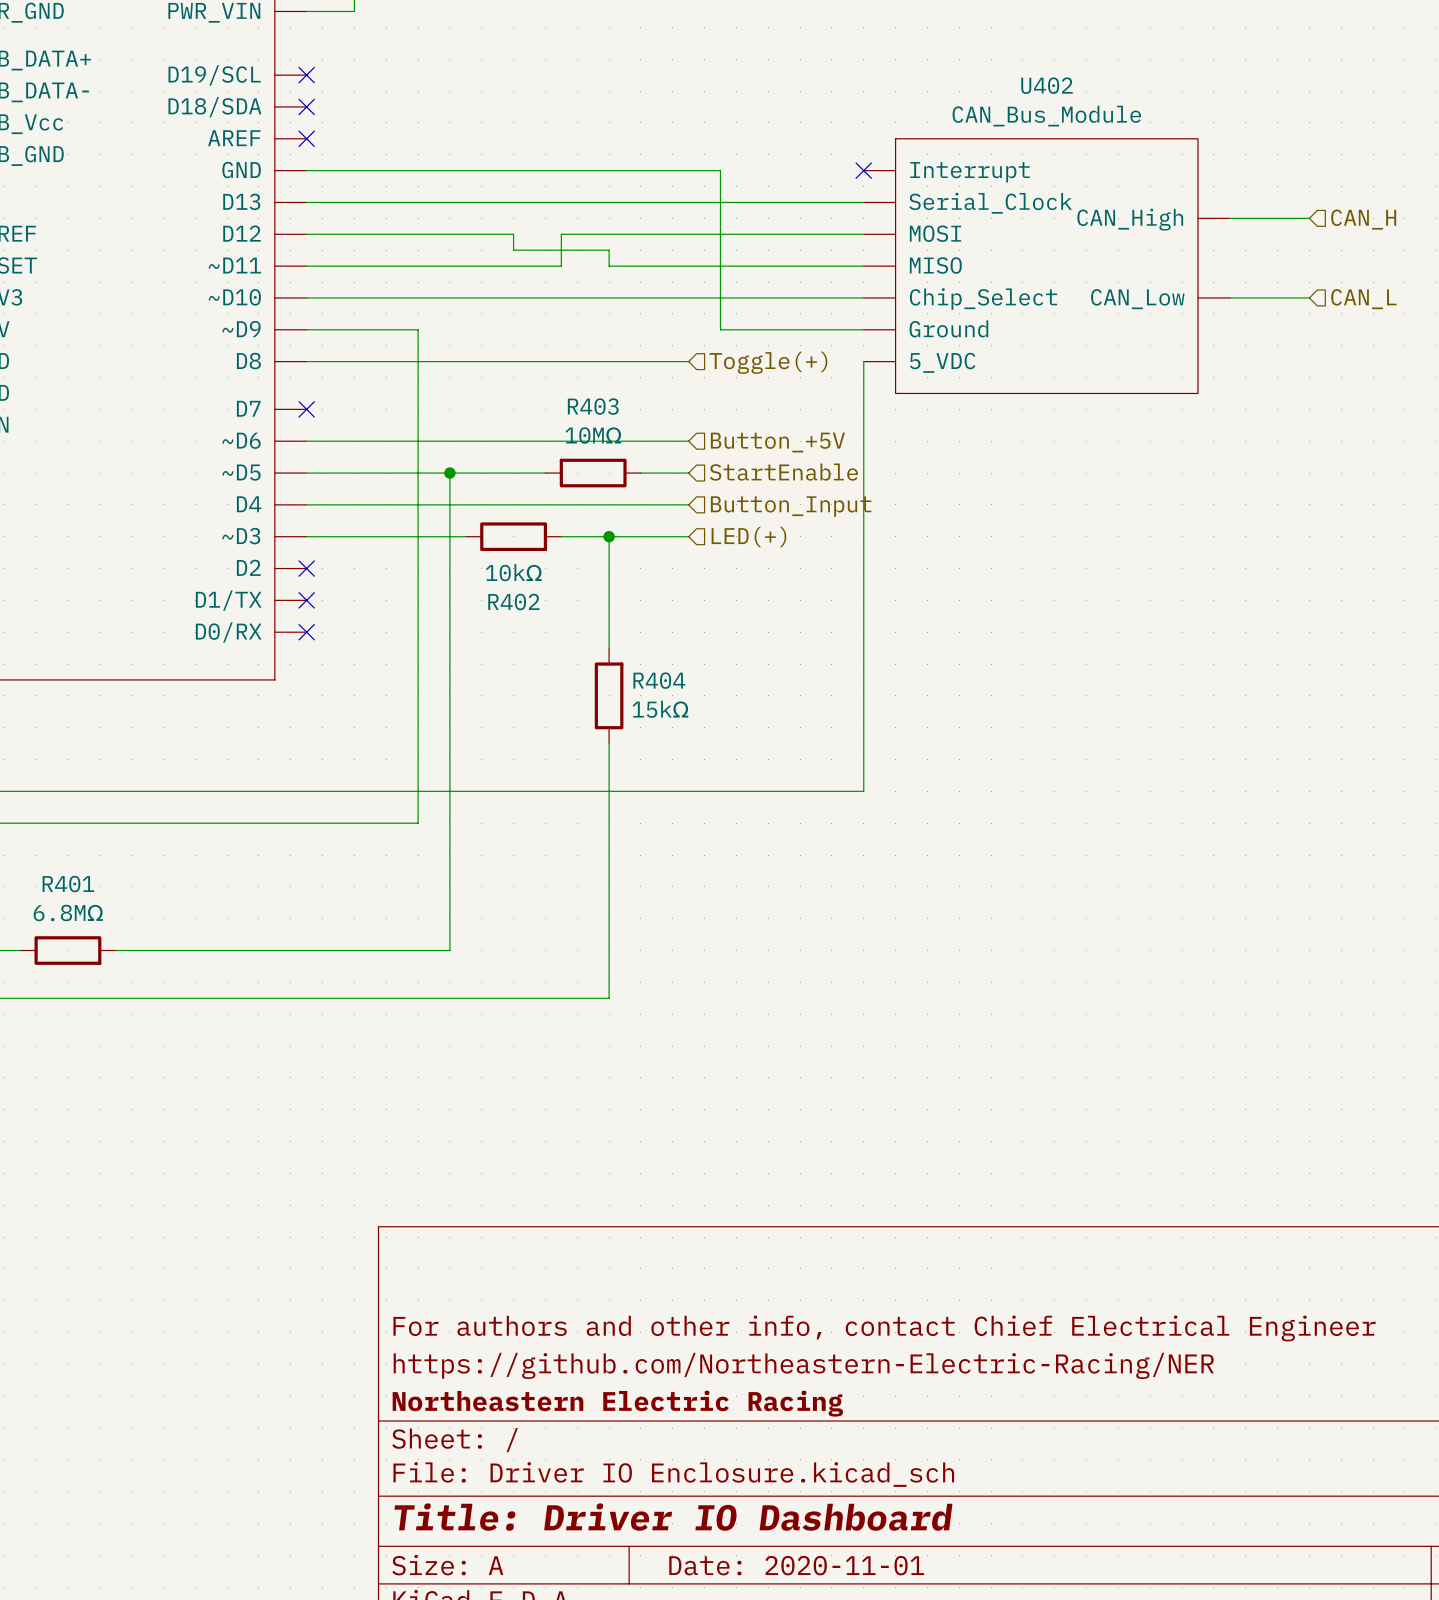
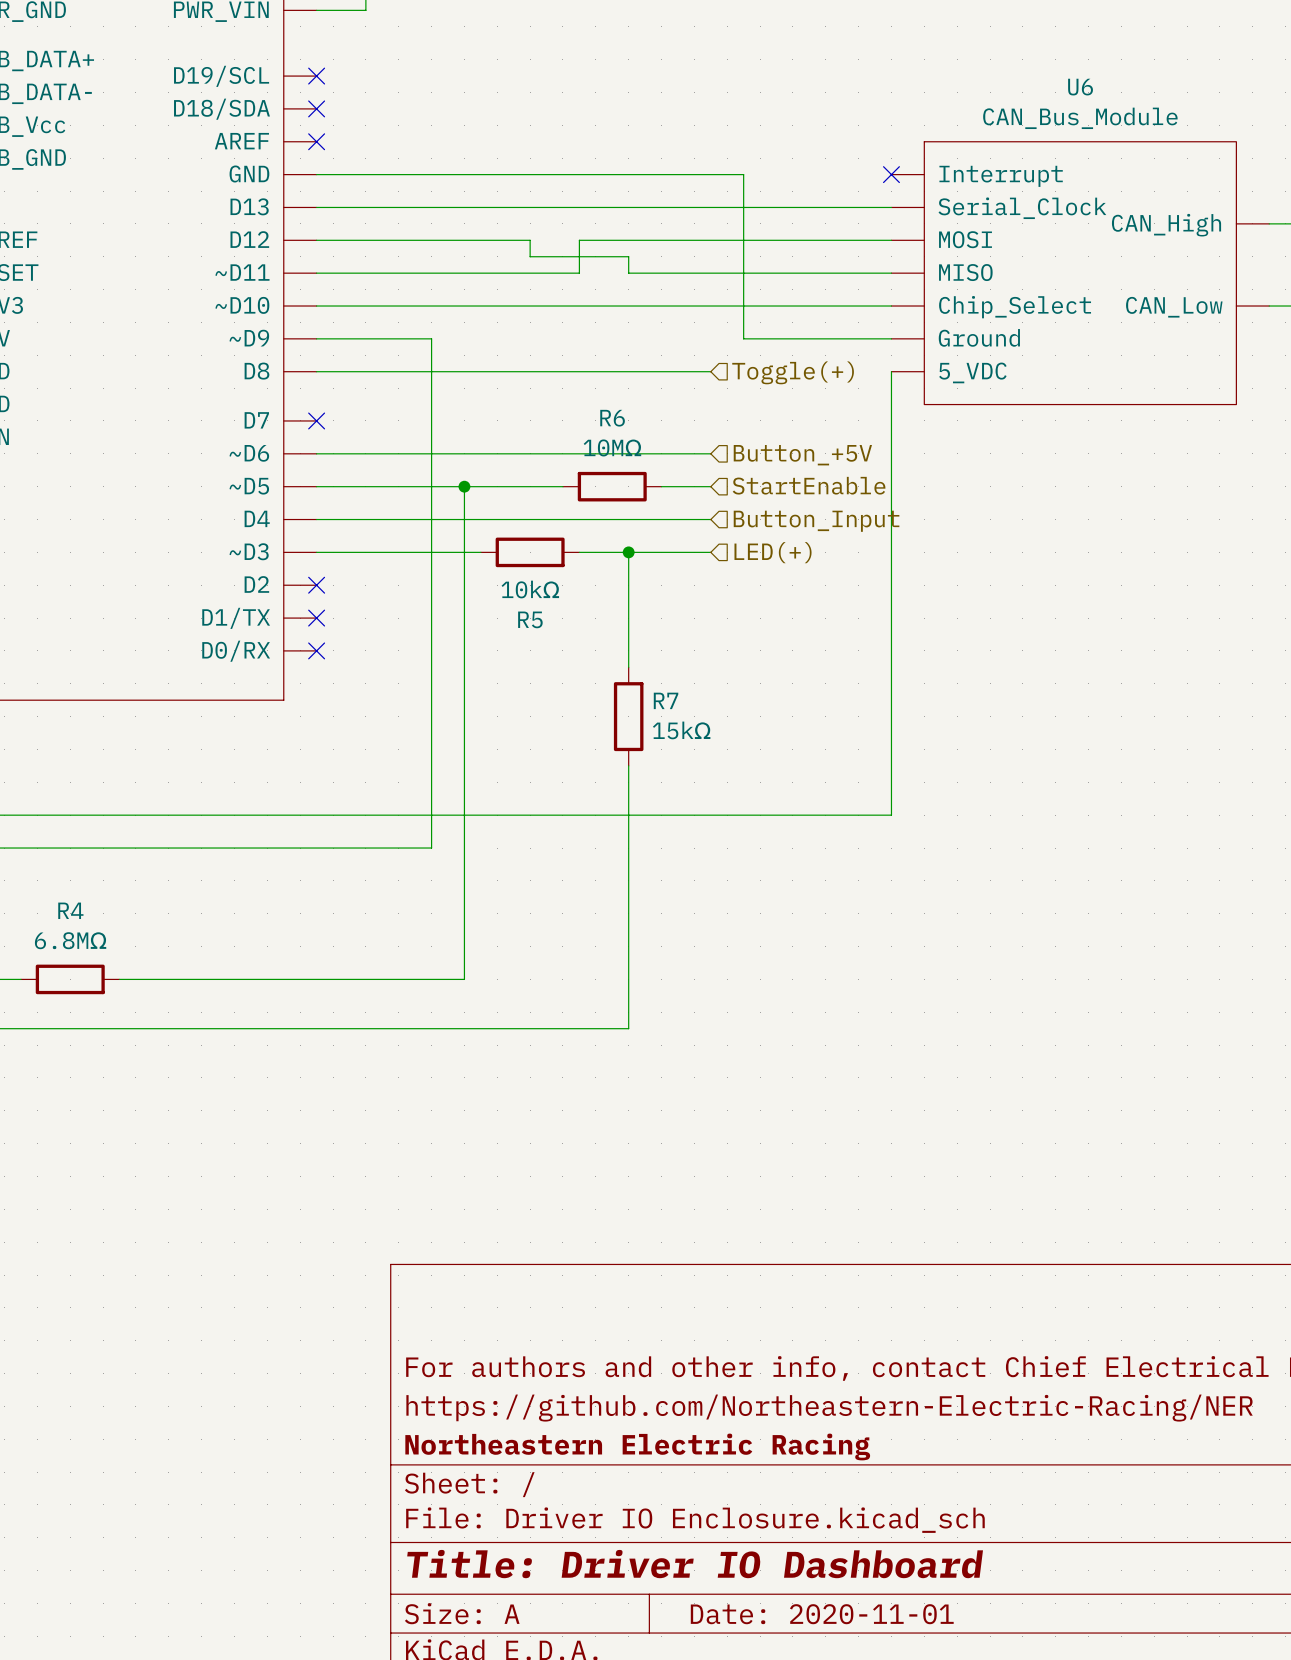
U402 name: U402 (1046, 85) -> U6 (1080, 87)
R403 name: R403 (593, 406) -> R6 (612, 418)
R402 name: R402 (513, 602) -> R5 (530, 619)
R404 name: R404 (659, 680) -> R7 (666, 700)
R401 name: R401 (68, 884) -> R4 (70, 910)

